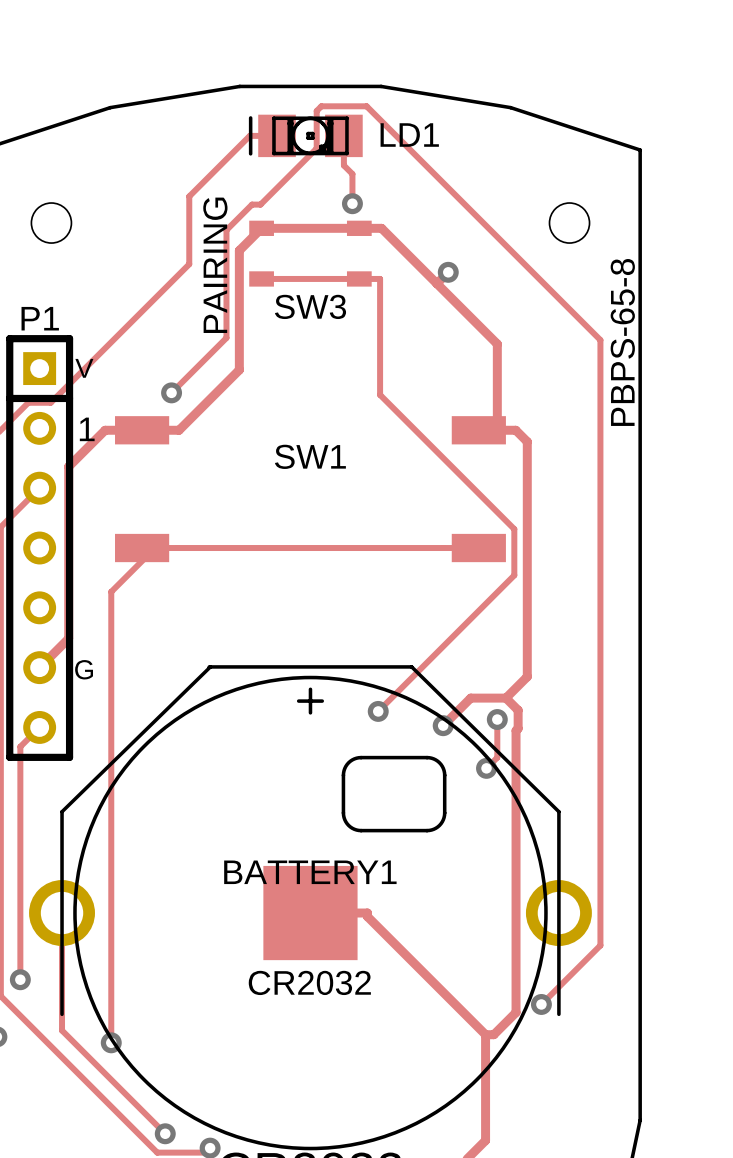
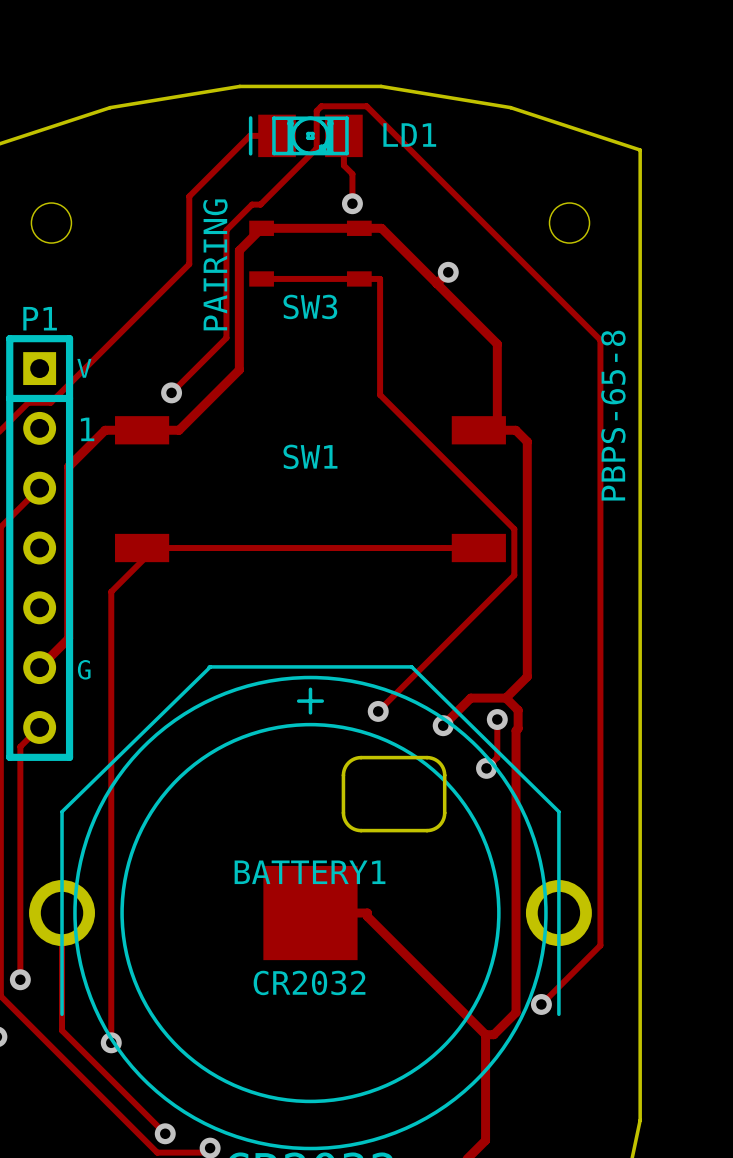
PBPS-65-8 name position: PBPS-65-8 (622, 342) -> PBPS-65-8 (613, 415)
BATTERY1 footprint: [29, 665, 592, 1151] -> [29, 665, 592, 1151]

